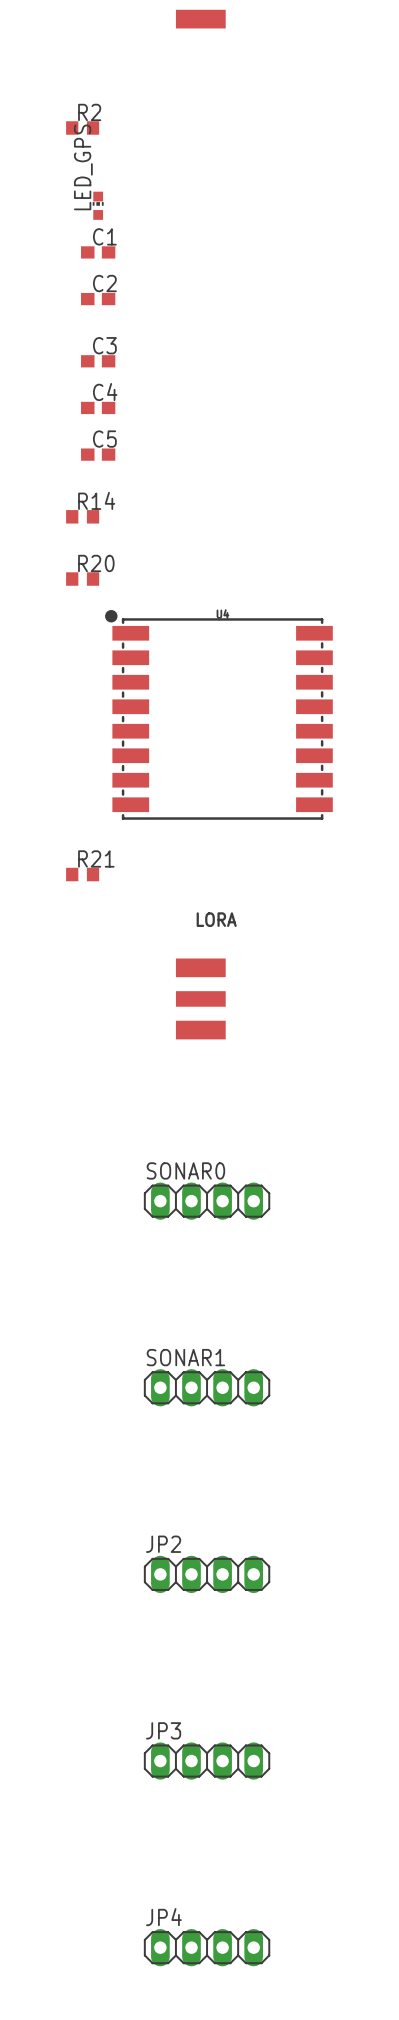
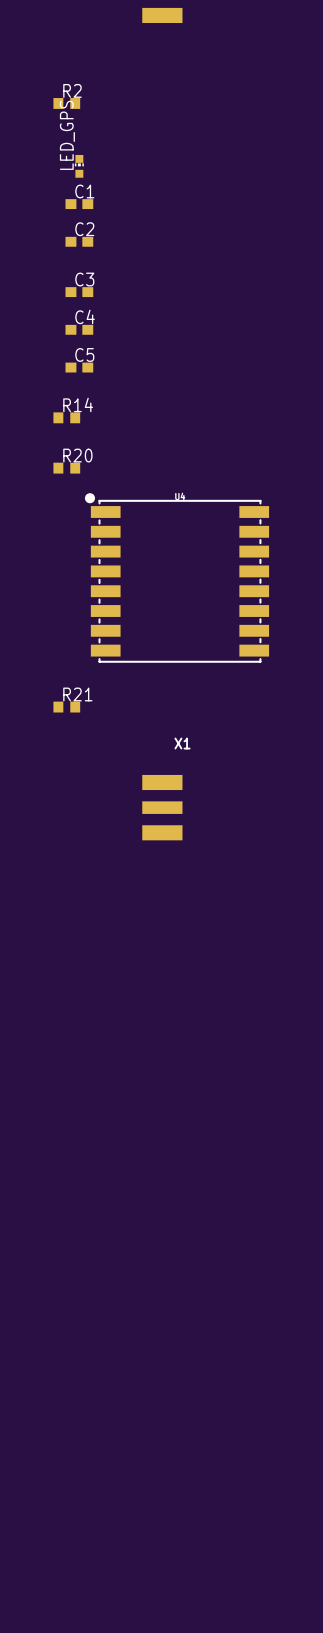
LORA name: LORA (216, 919) -> X1 (182, 743)
SONAR0: (207, 1201) -> none
SONAR1: (207, 1387) -> none
JP2: (207, 1574) -> none
JP3: (207, 1761) -> none
JP4: (207, 1947) -> none

